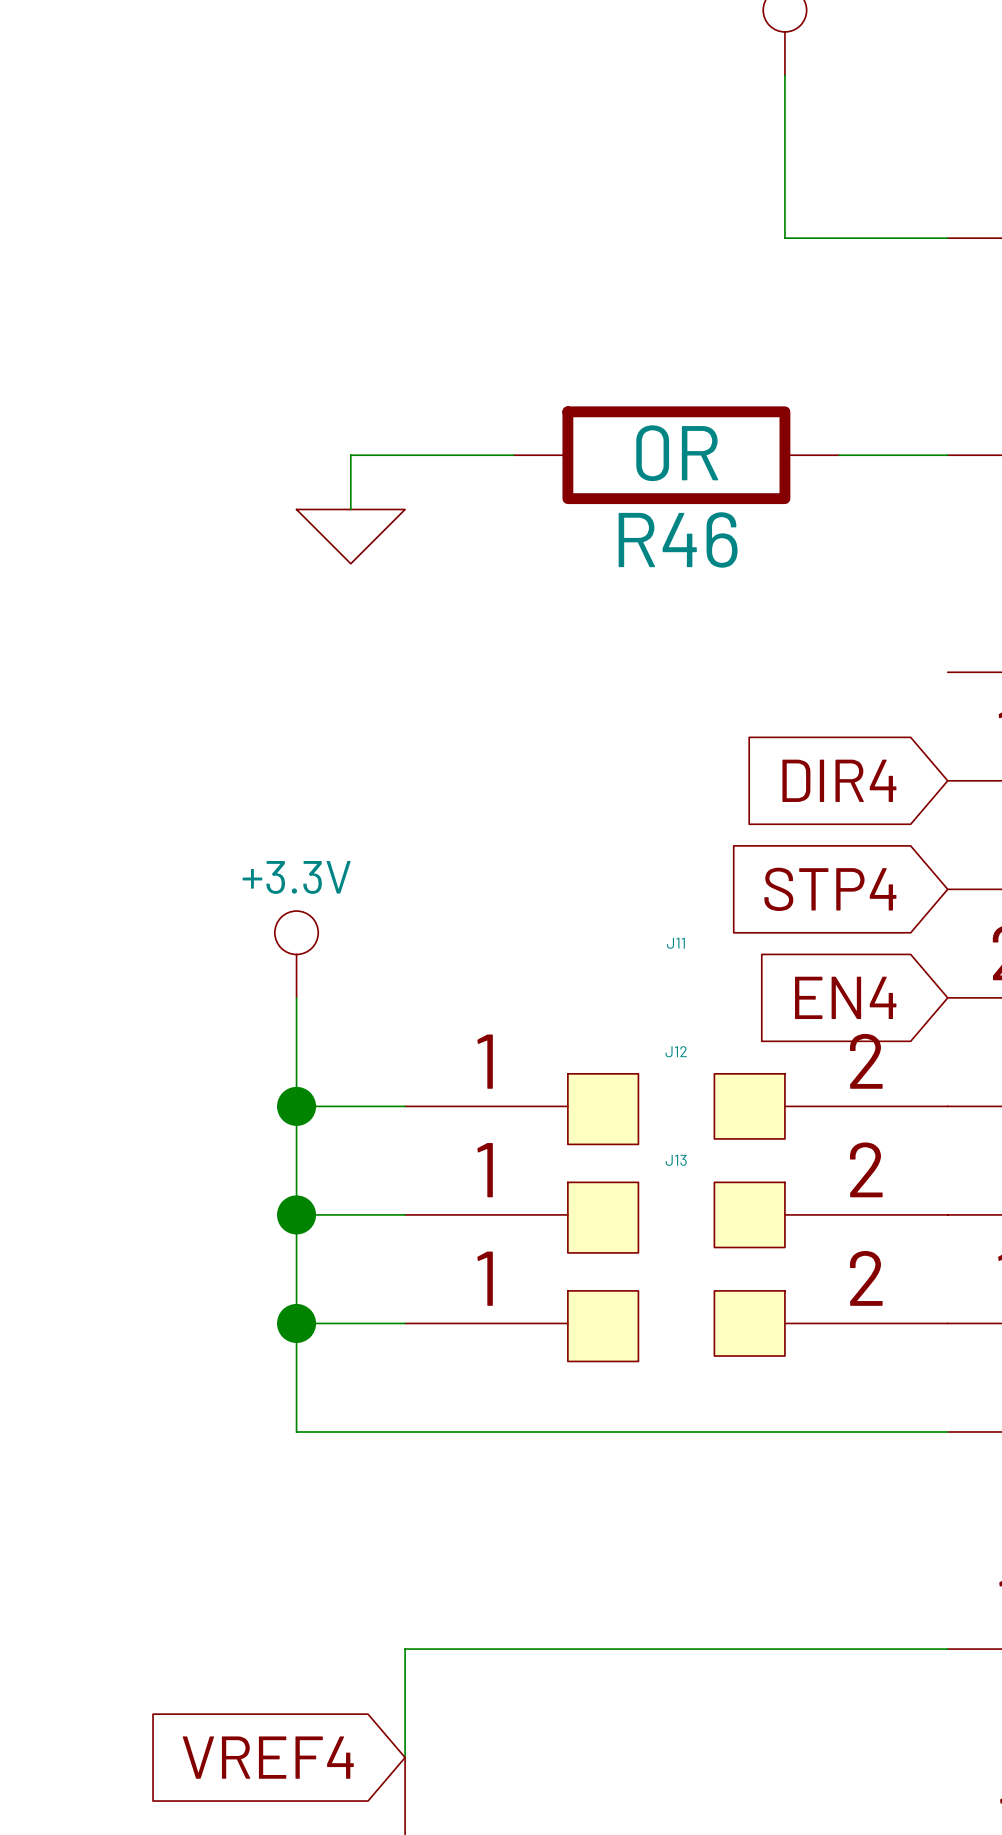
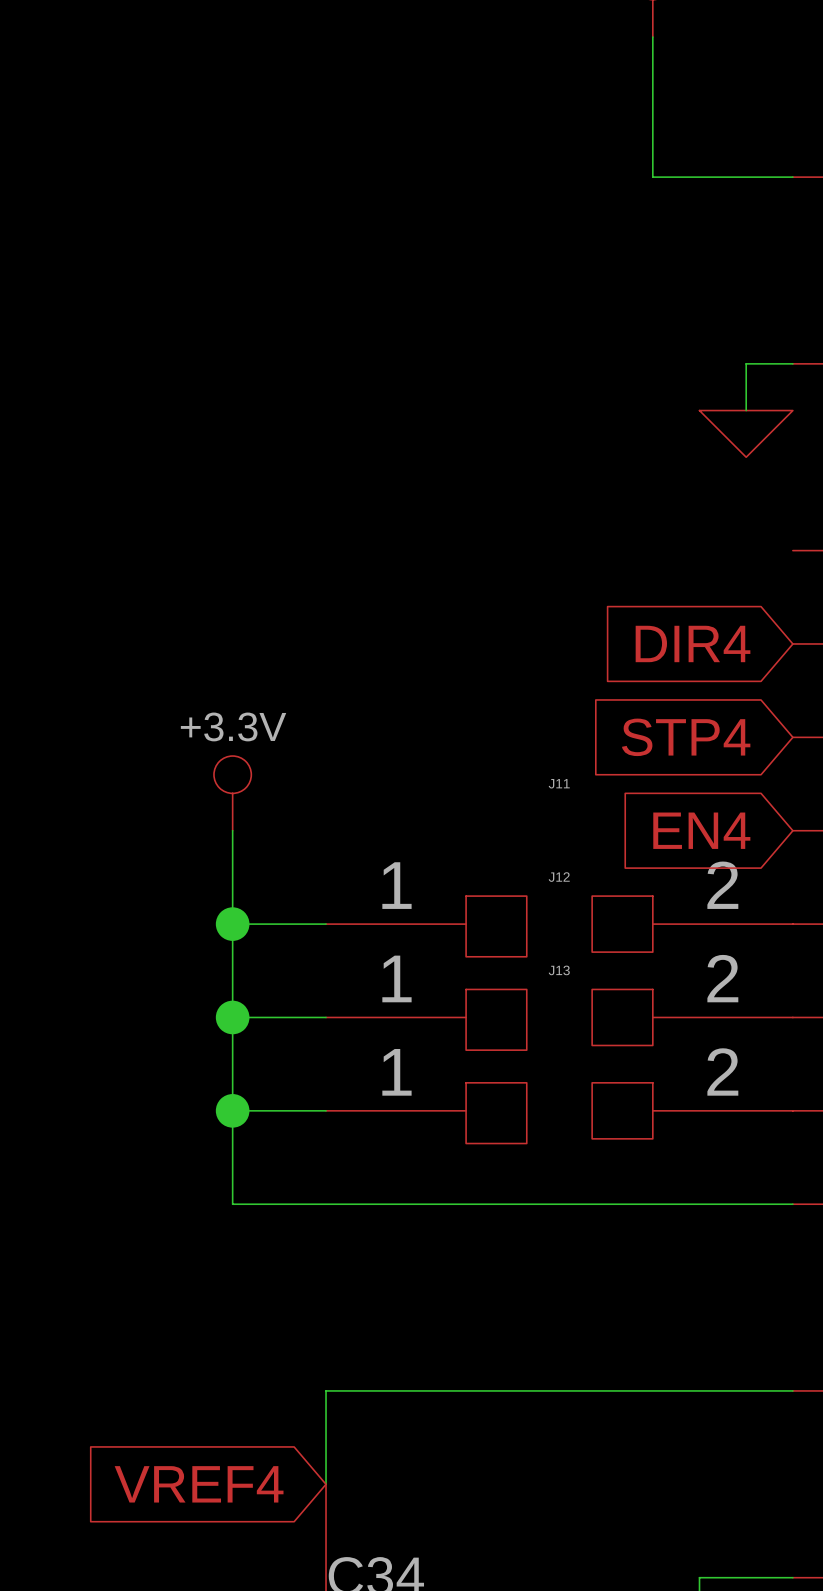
wire: (513, 455) (350, 455) (350, 509) -> none
R46: 0R (676, 455) -> none
wire: (839, 455) (893, 455) -> (746, 410) (746, 363)
power symbol position: (350, 536) -> (746, 433)

